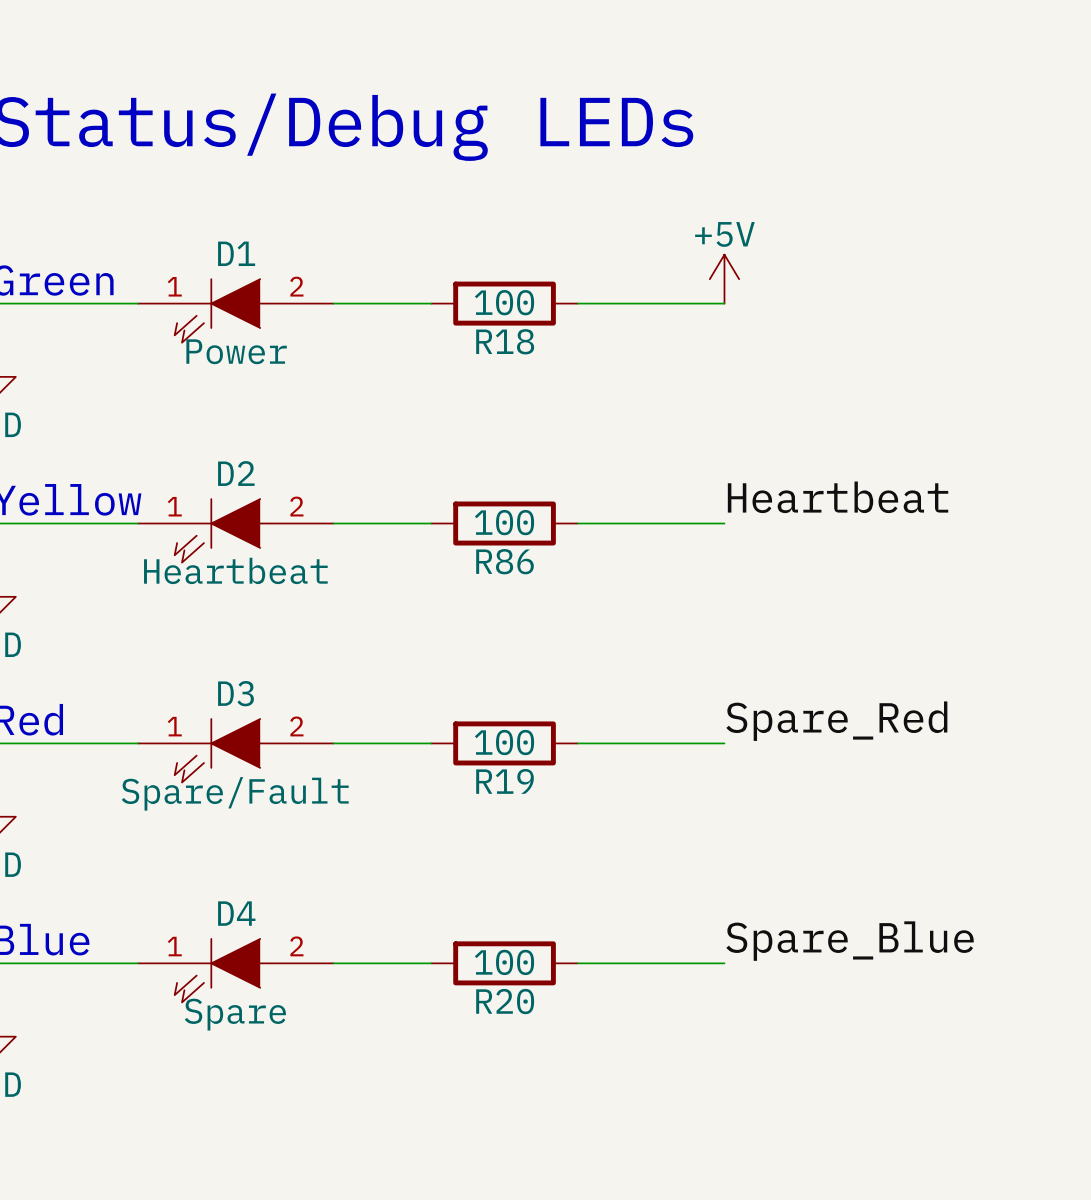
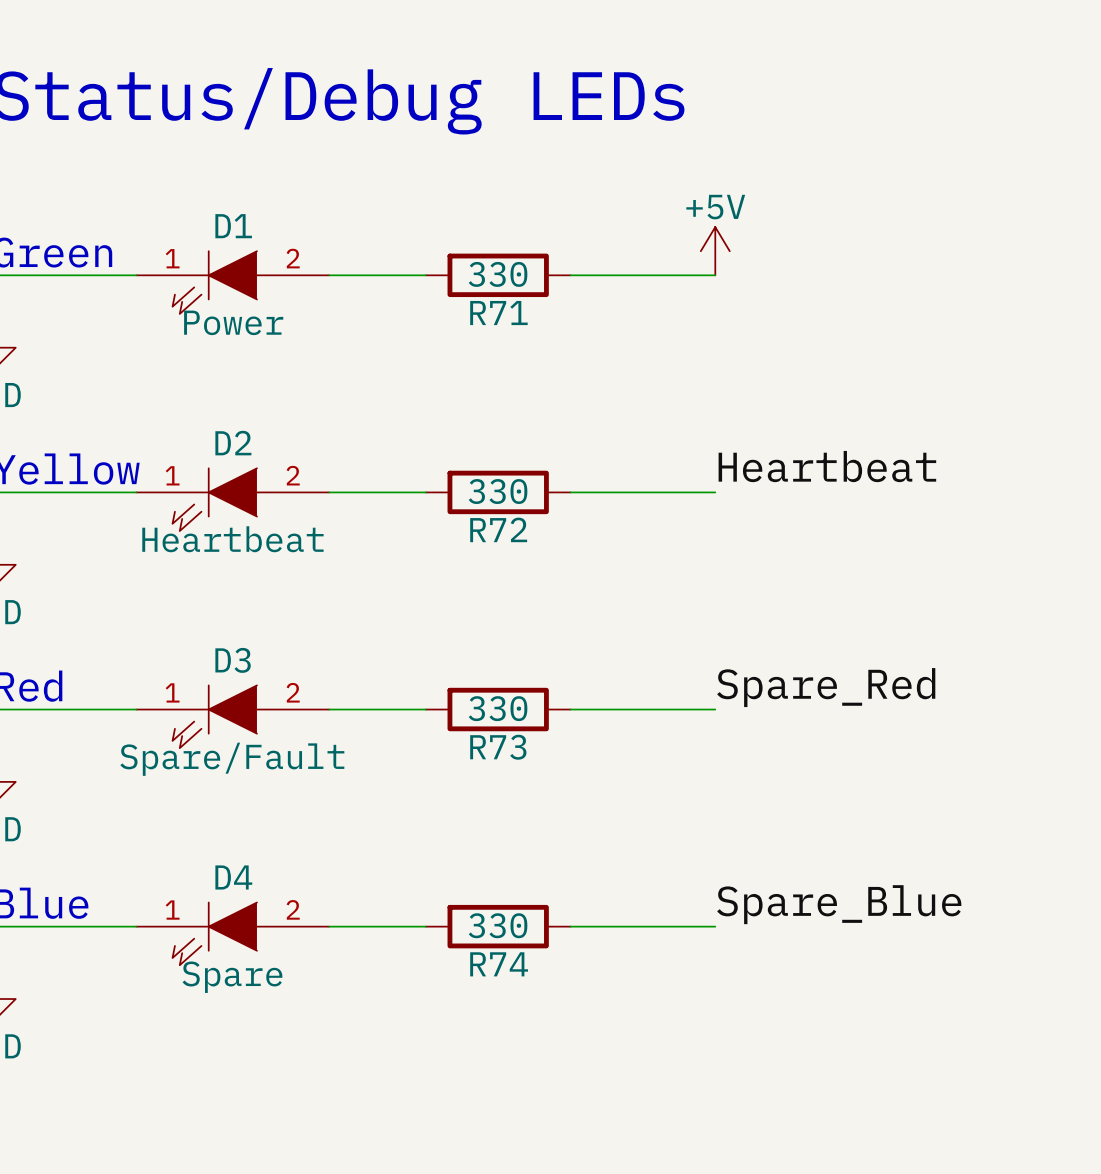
R18 value: 100 (504, 302) -> 330 (498, 274)
R18 name: R18 (505, 341) -> R71 (498, 313)
R86 value: 100 (504, 522) -> 330 (498, 491)
R86 name: R86 (505, 561) -> R72 (498, 529)
R19 value: 100 (504, 742) -> 330 (498, 708)
R19 name: R19 (505, 781) -> R73 (498, 747)
R20 value: 100 (504, 962) -> 330 (498, 925)
R20 name: R20 (505, 1001) -> R74 (499, 964)

